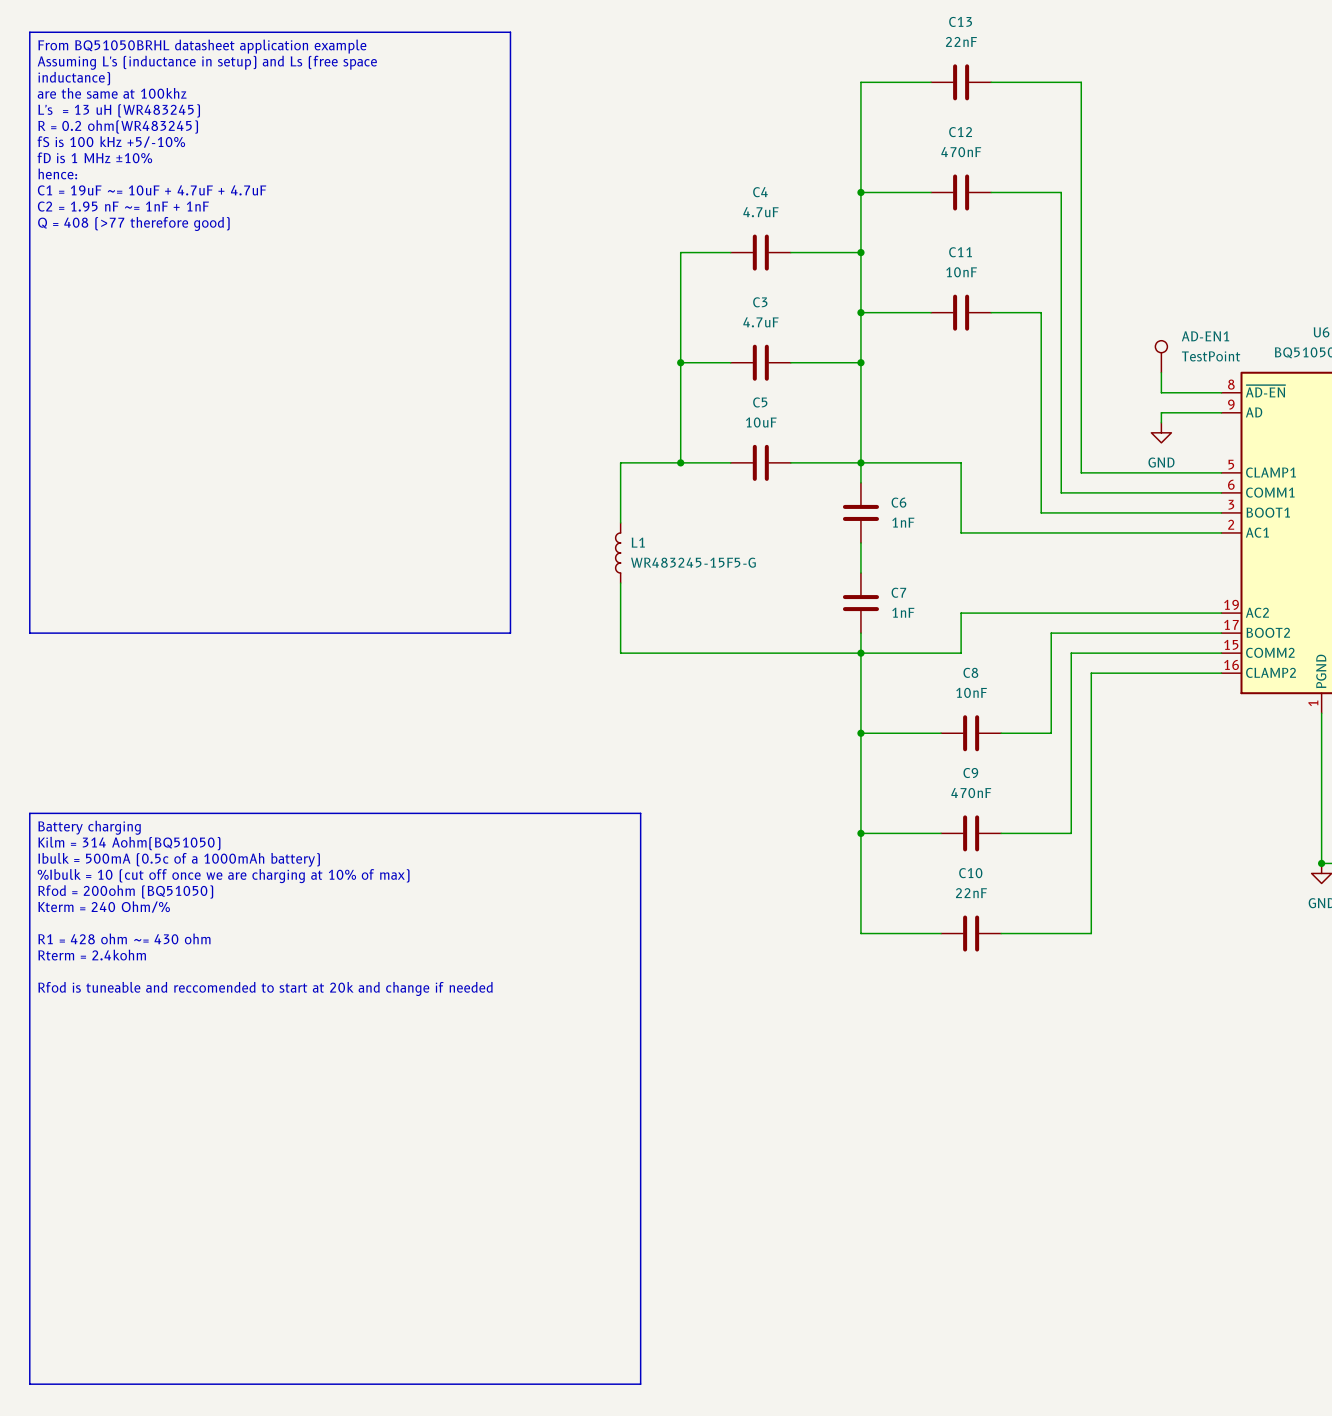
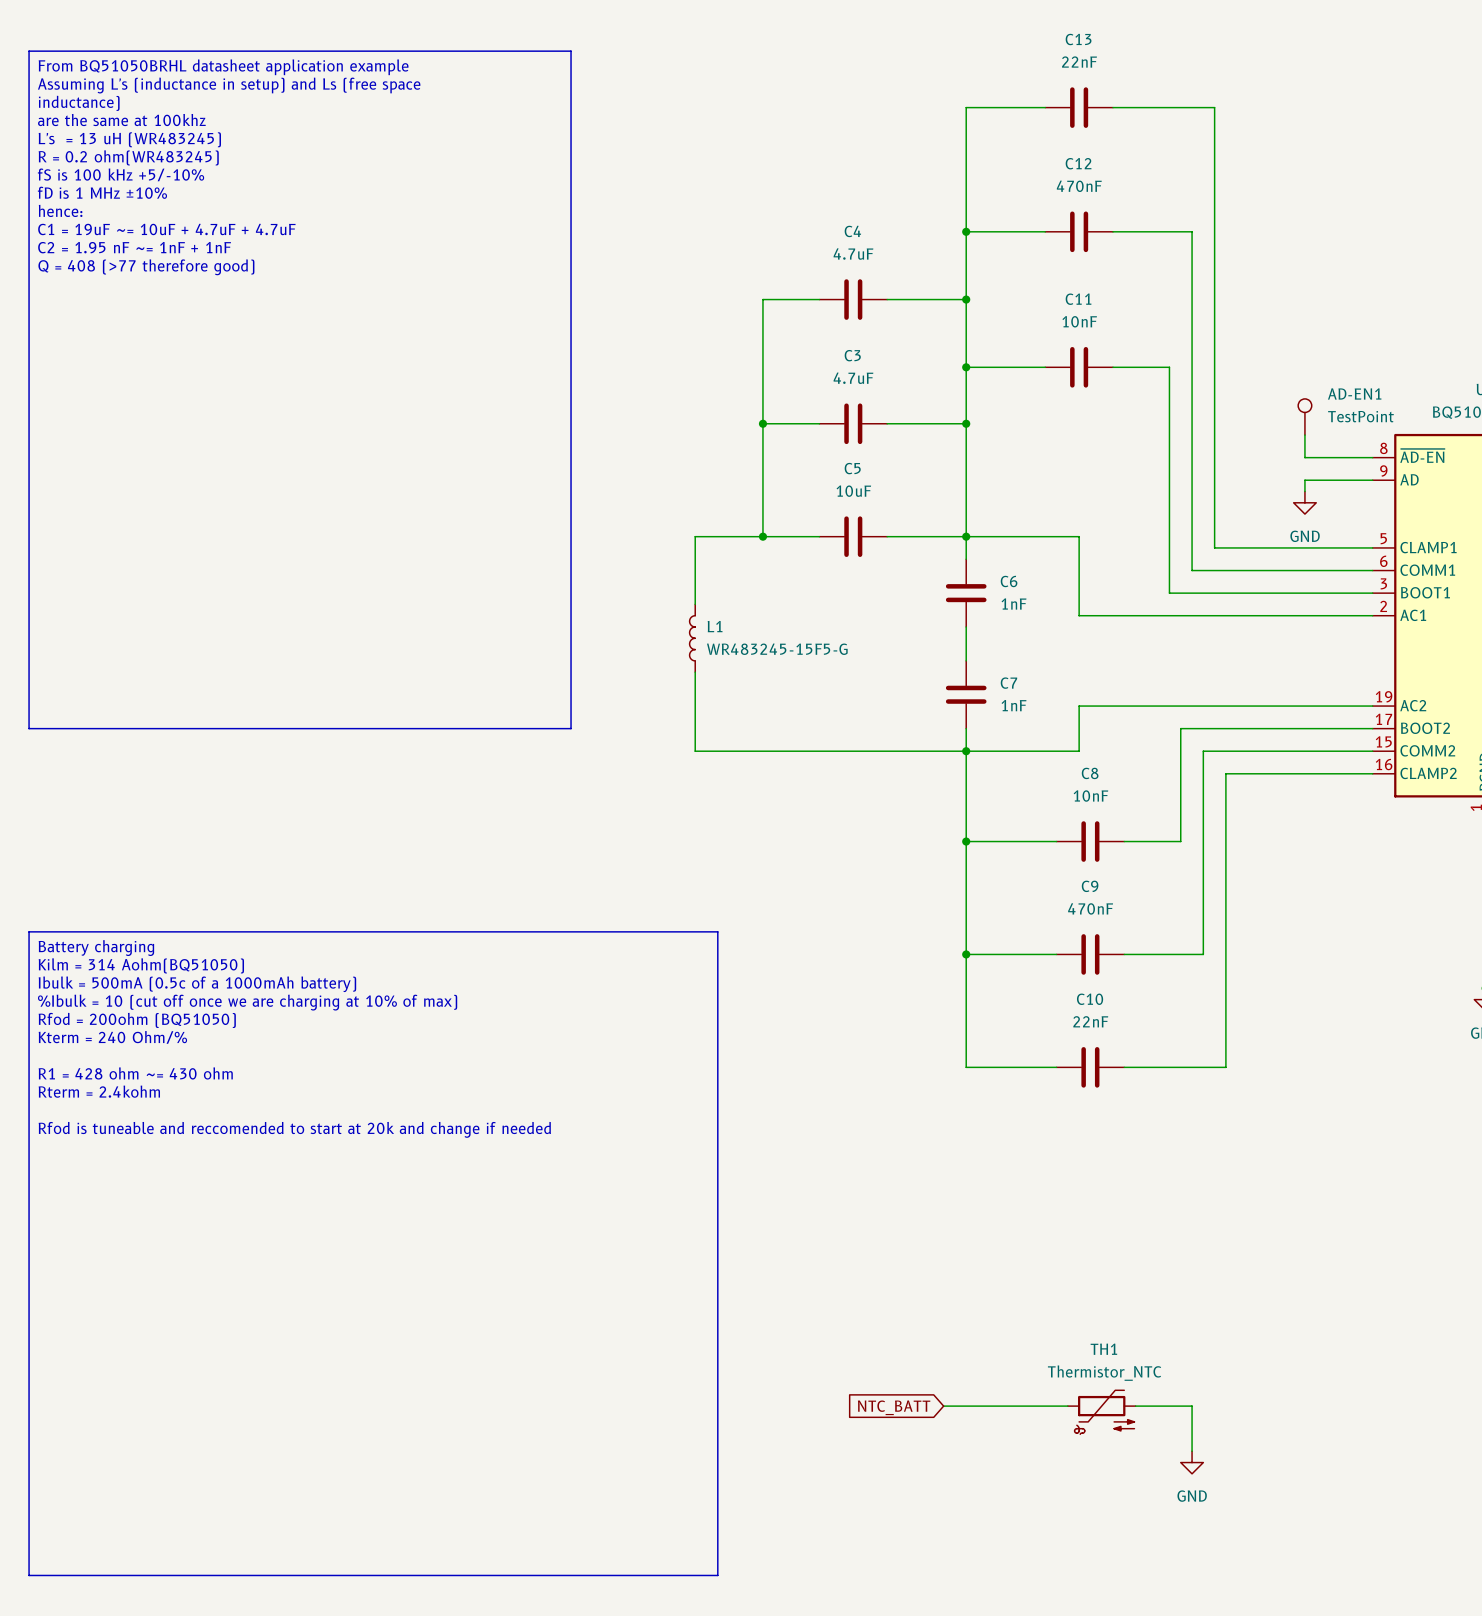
wire: none -> (943, 1406) (1067, 1406)
wire: none -> (1135, 1406) (1192, 1406) (1192, 1451)
global label: none -> NTC_BATT (894, 1407)
TH1: none -> Thermistor_NTC (1101, 1412)
power symbol: none -> GND (1192, 1462)

